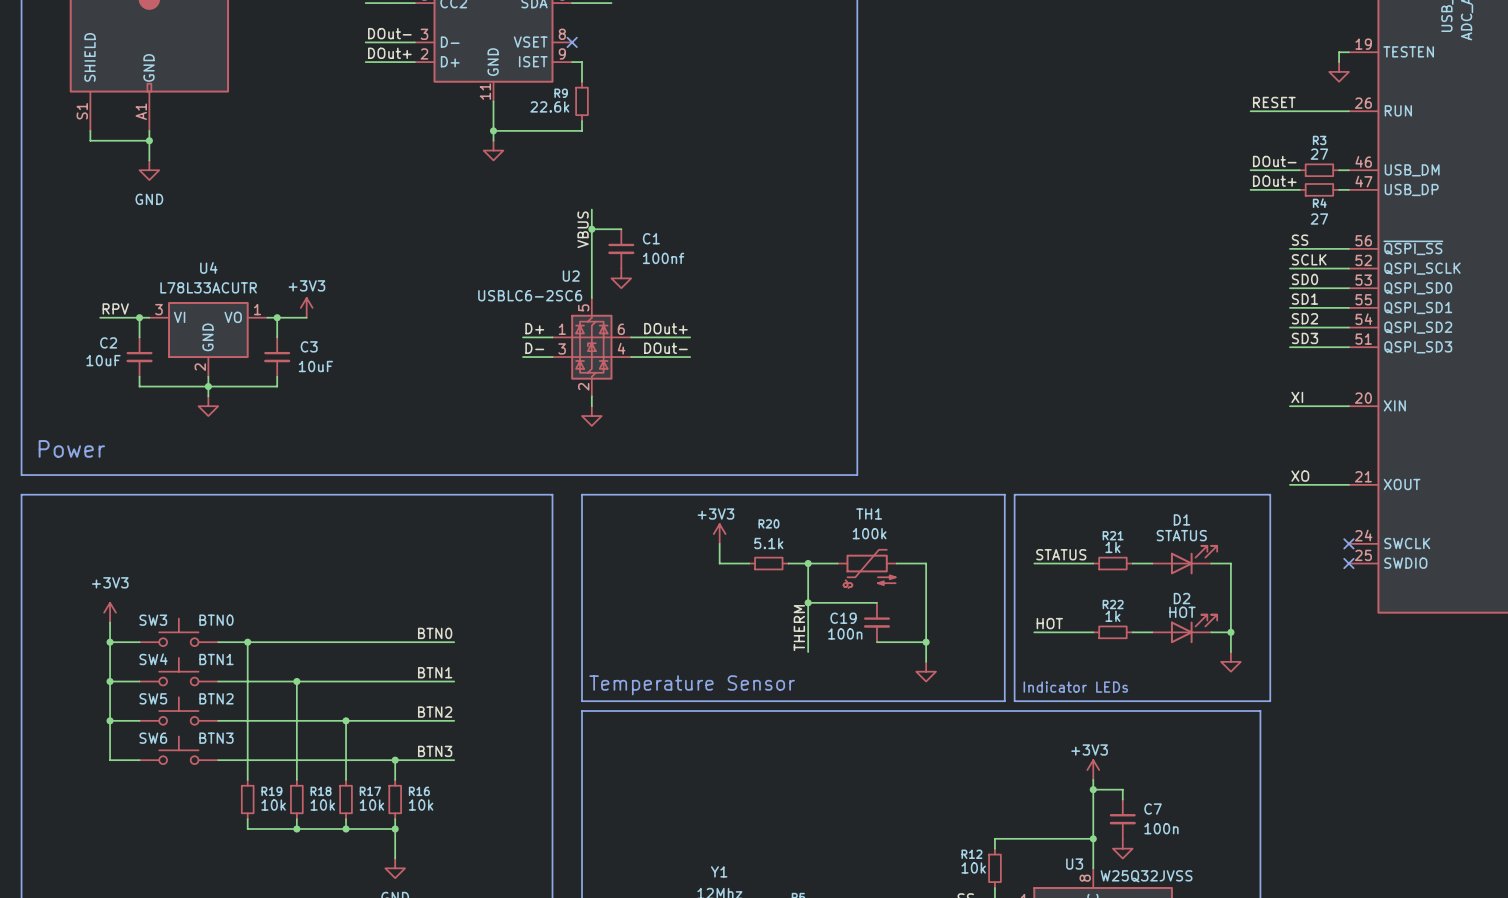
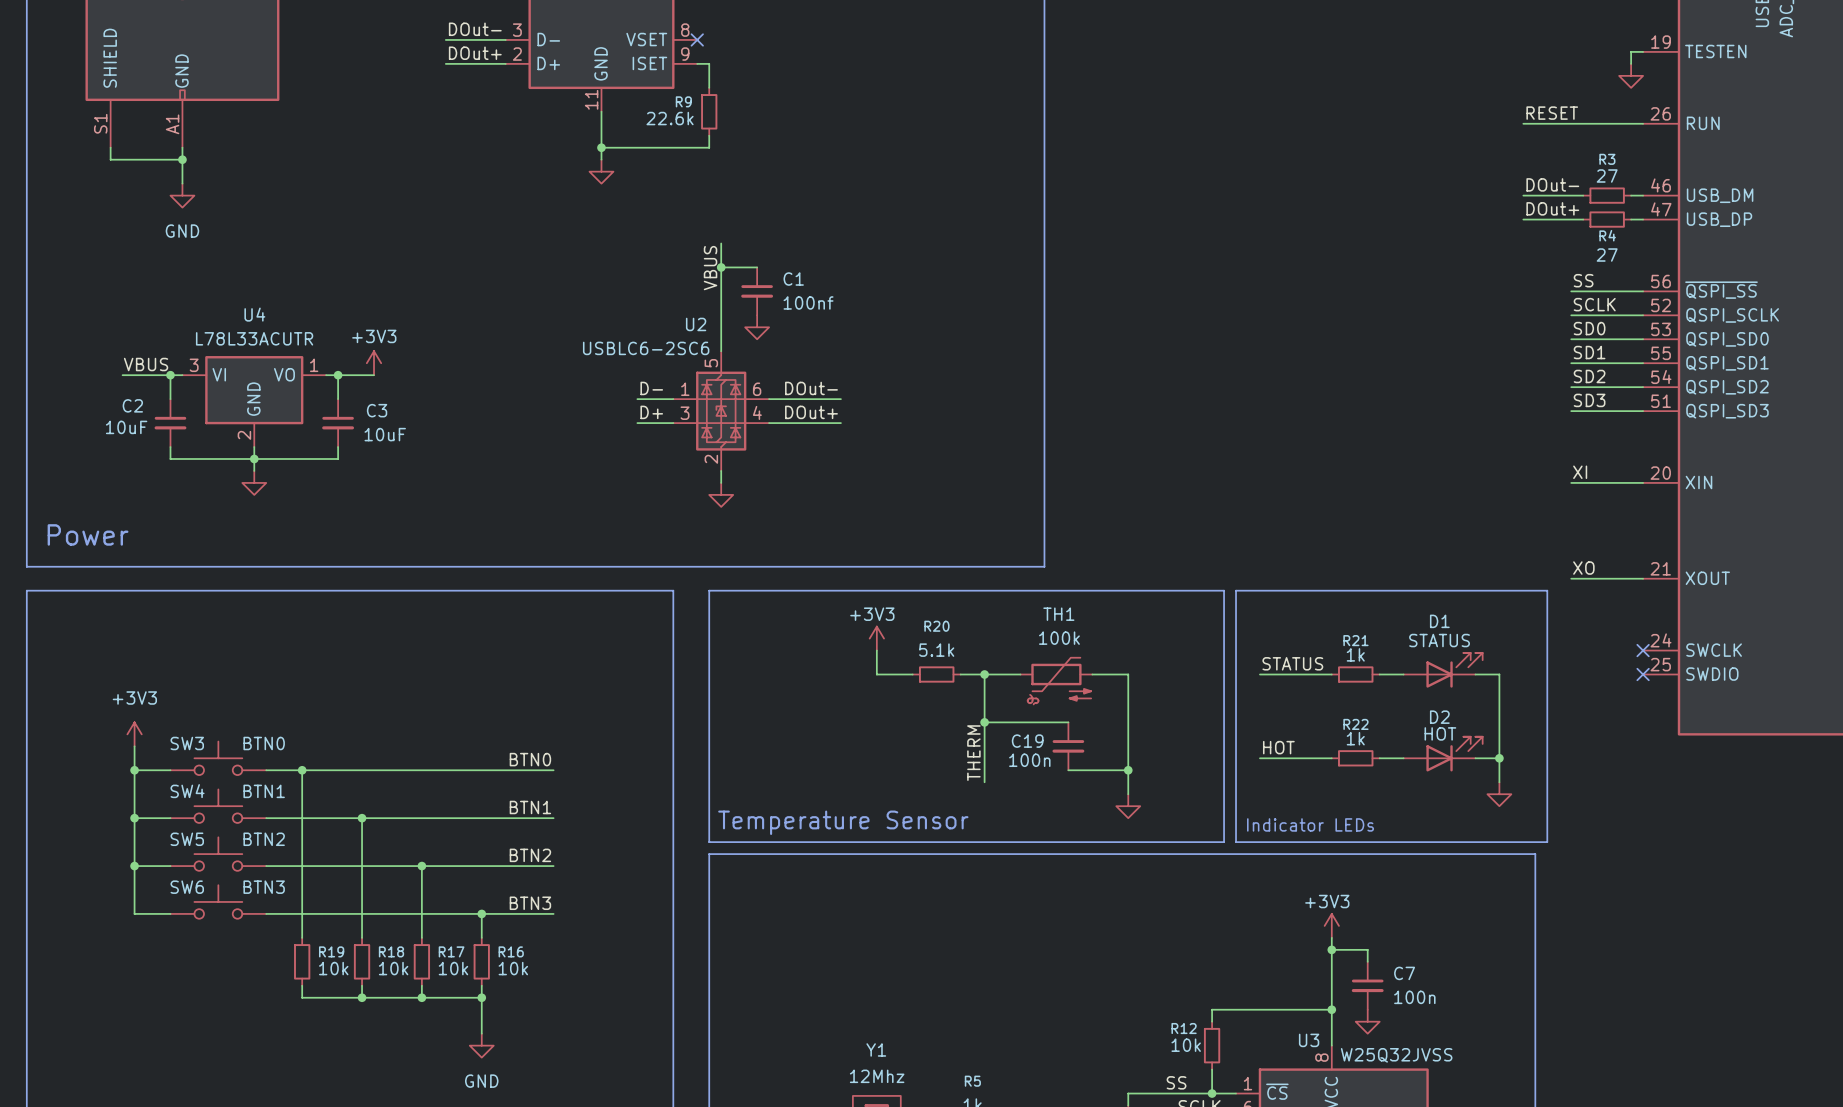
label: RPV (115, 308) -> VBUS (146, 364)
label: D+ (534, 328) -> D- (651, 388)
label: DOut+ (665, 328) -> DOut- (811, 388)
label: D- (534, 348) -> D+ (651, 412)
label: DOut- (665, 348) -> DOut+ (811, 412)

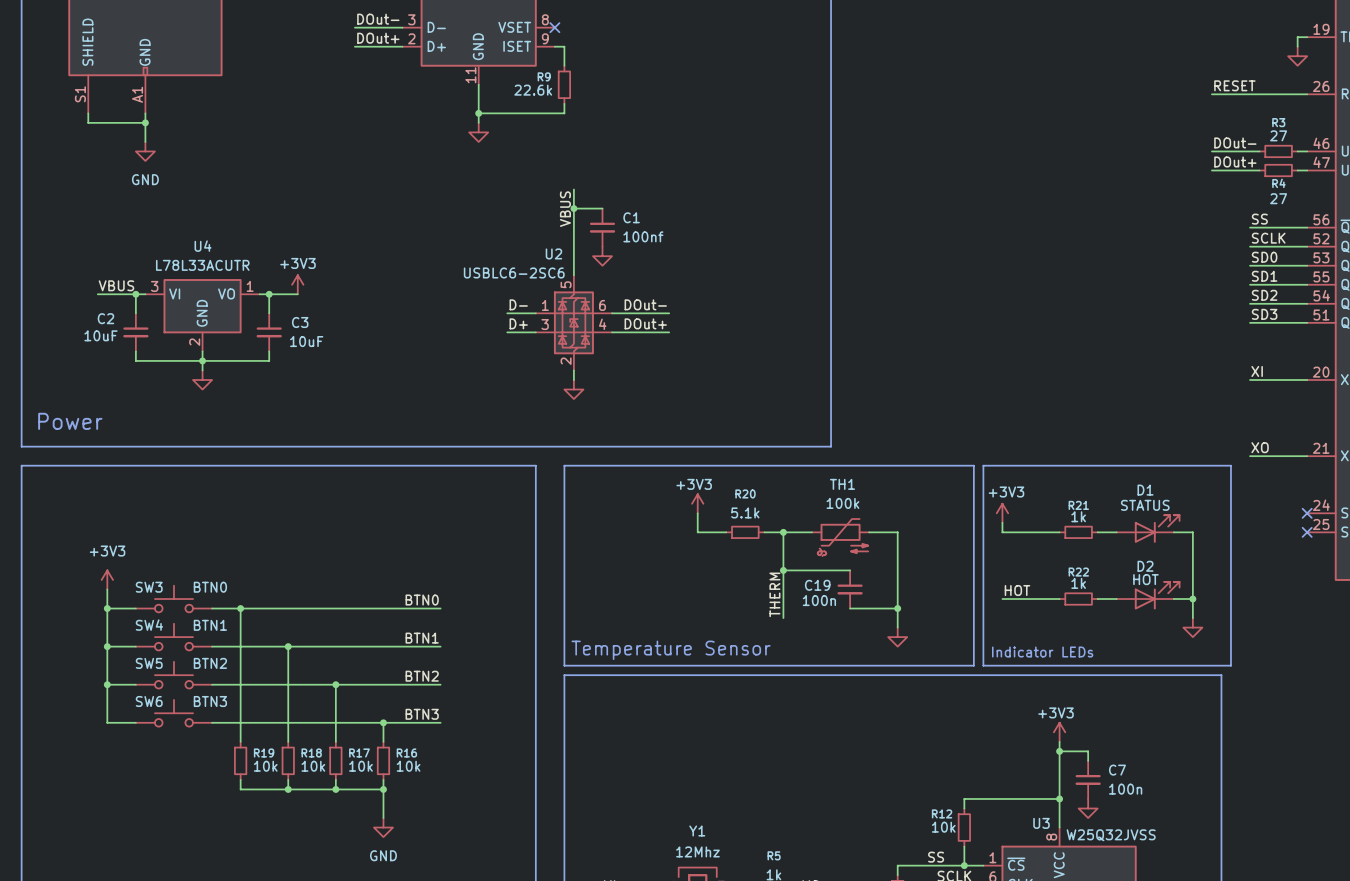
power symbol: none -> +3V3 (1002, 513)
wire: none -> (1002, 522) (1002, 532)
label: STATUS (1292, 663) -> none

